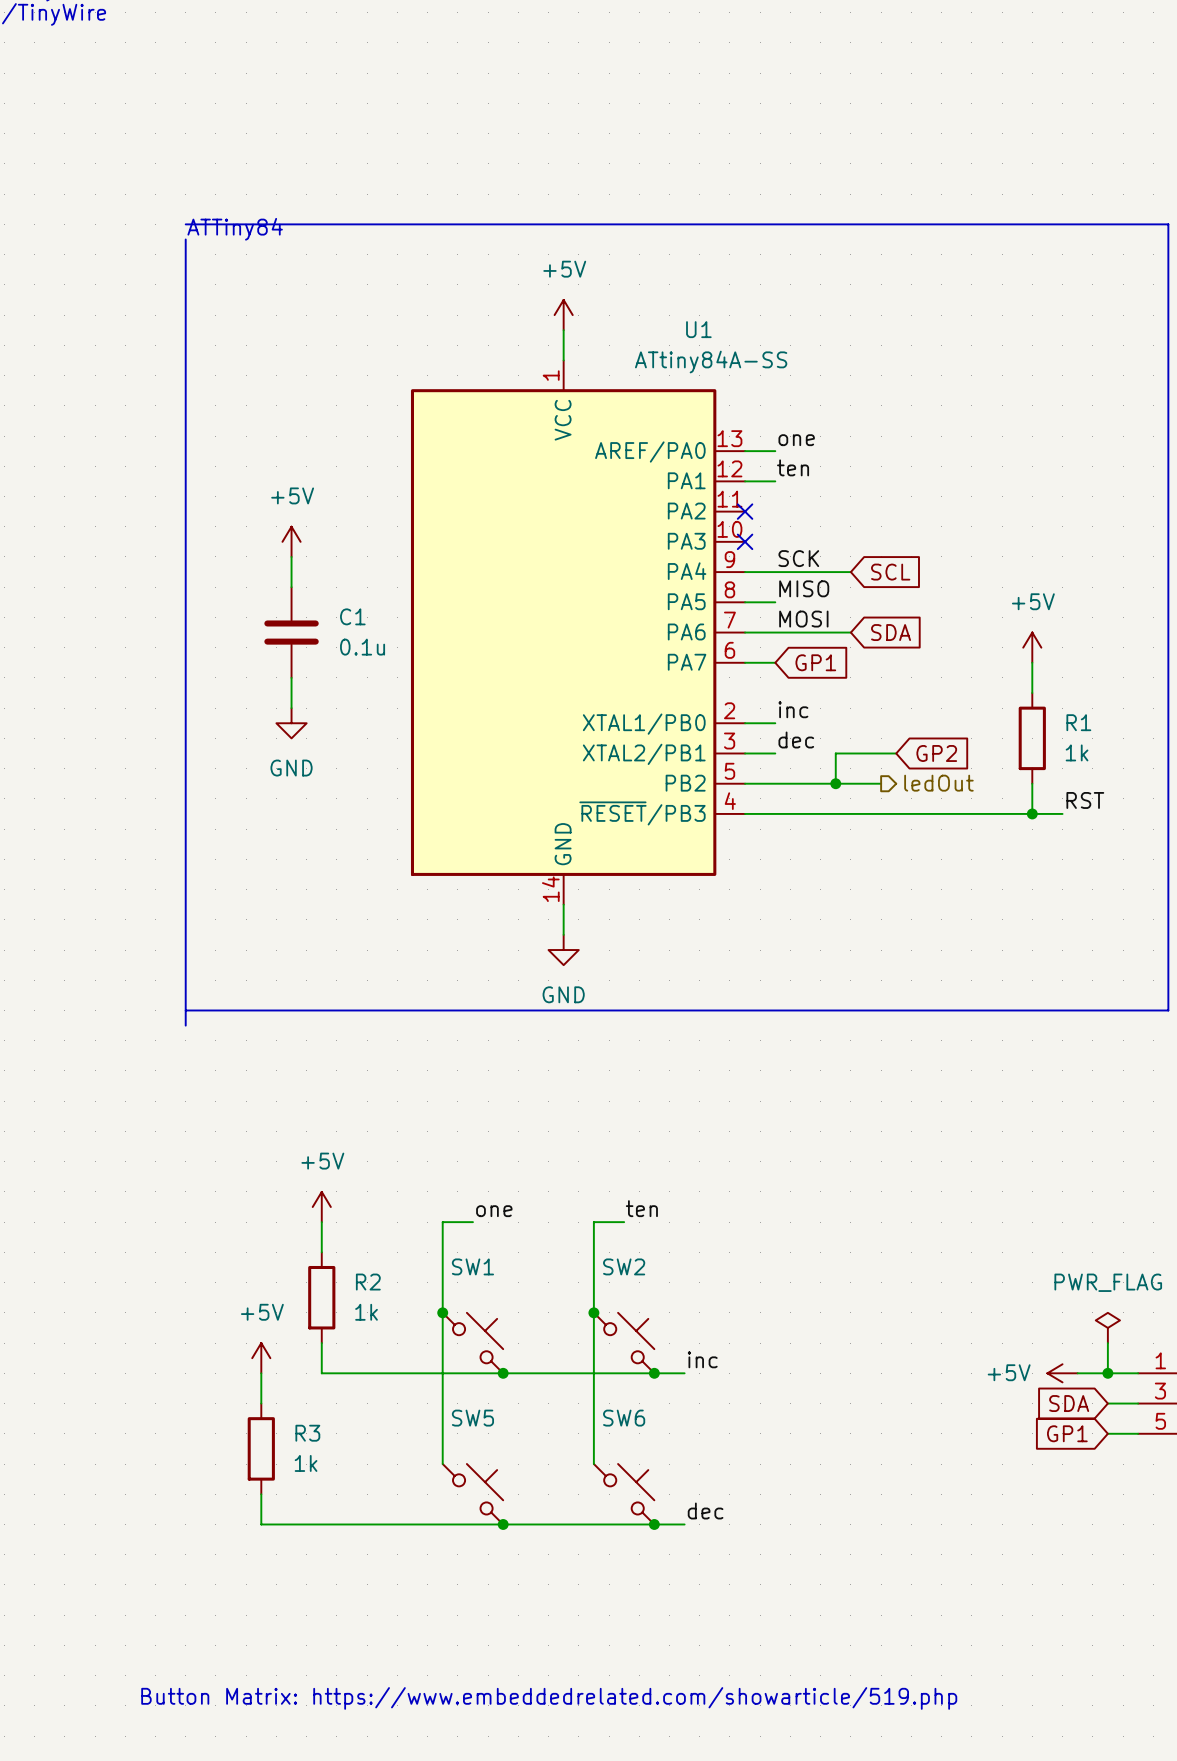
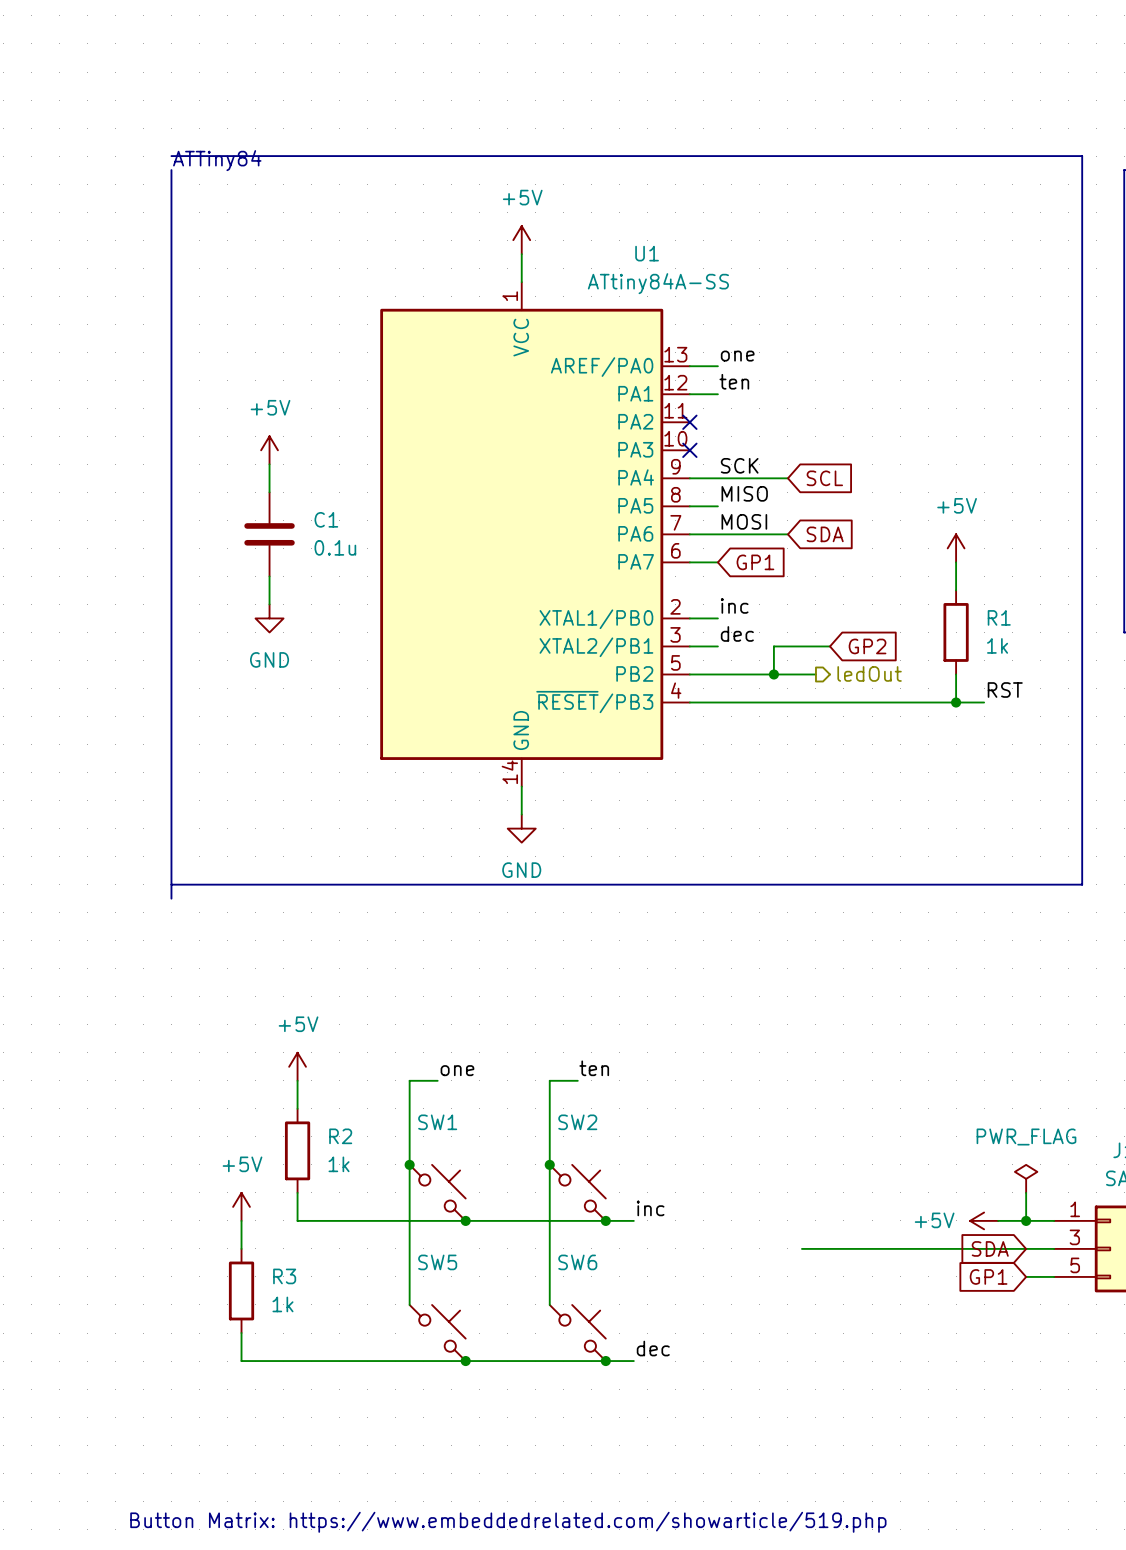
wire: none -> (801, 1248) (1026, 1248)

